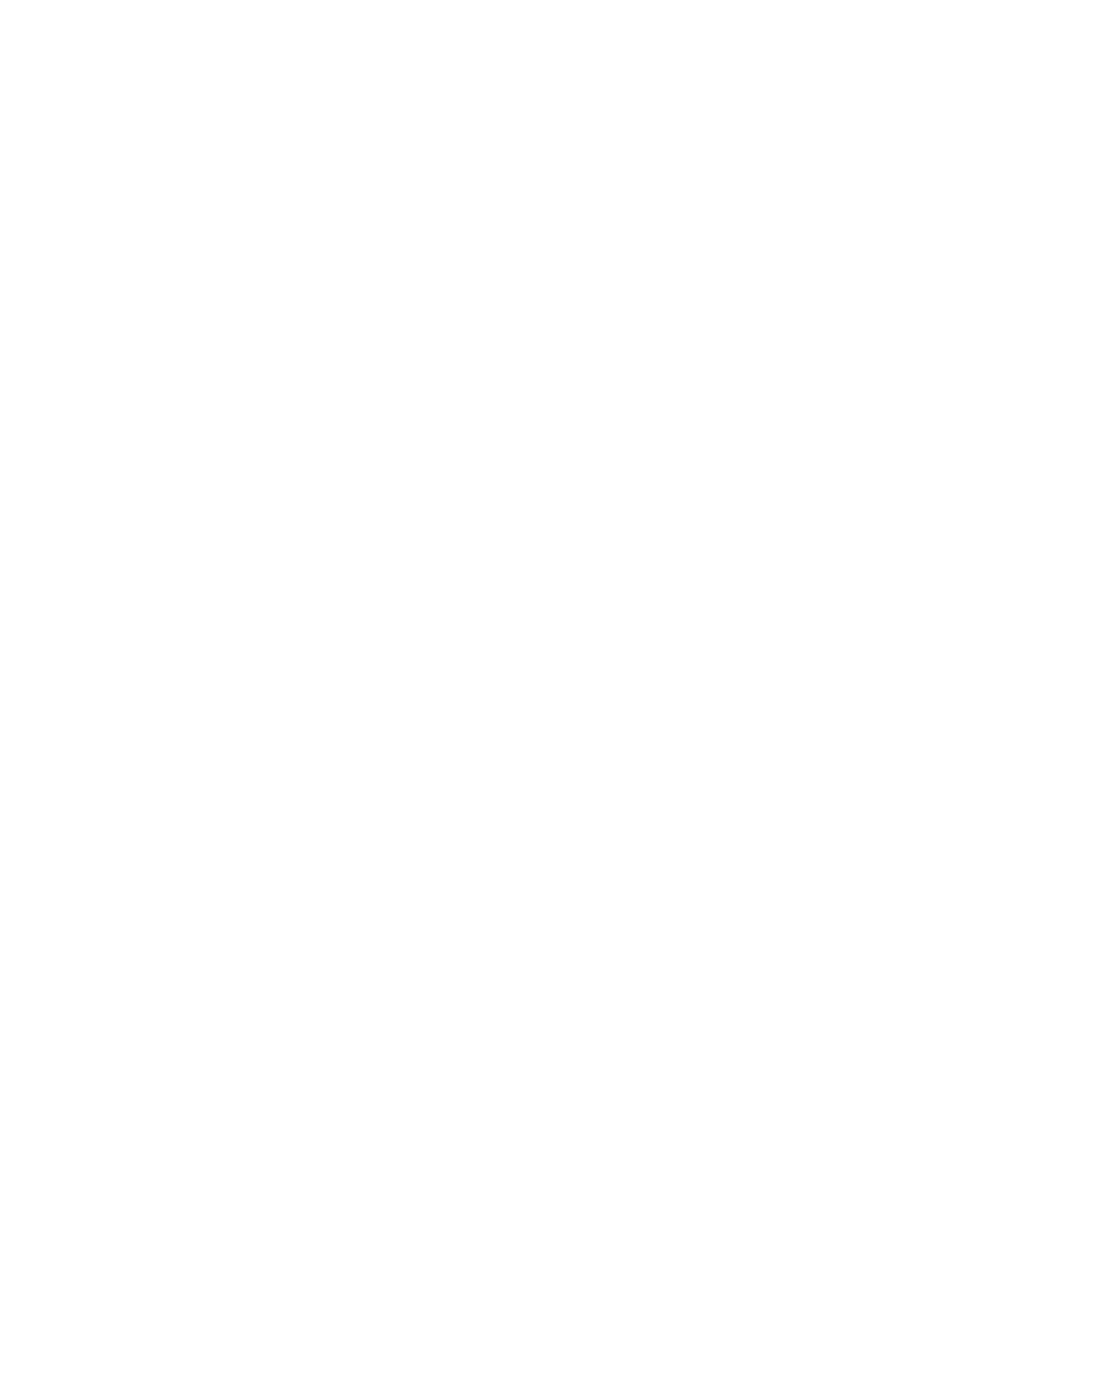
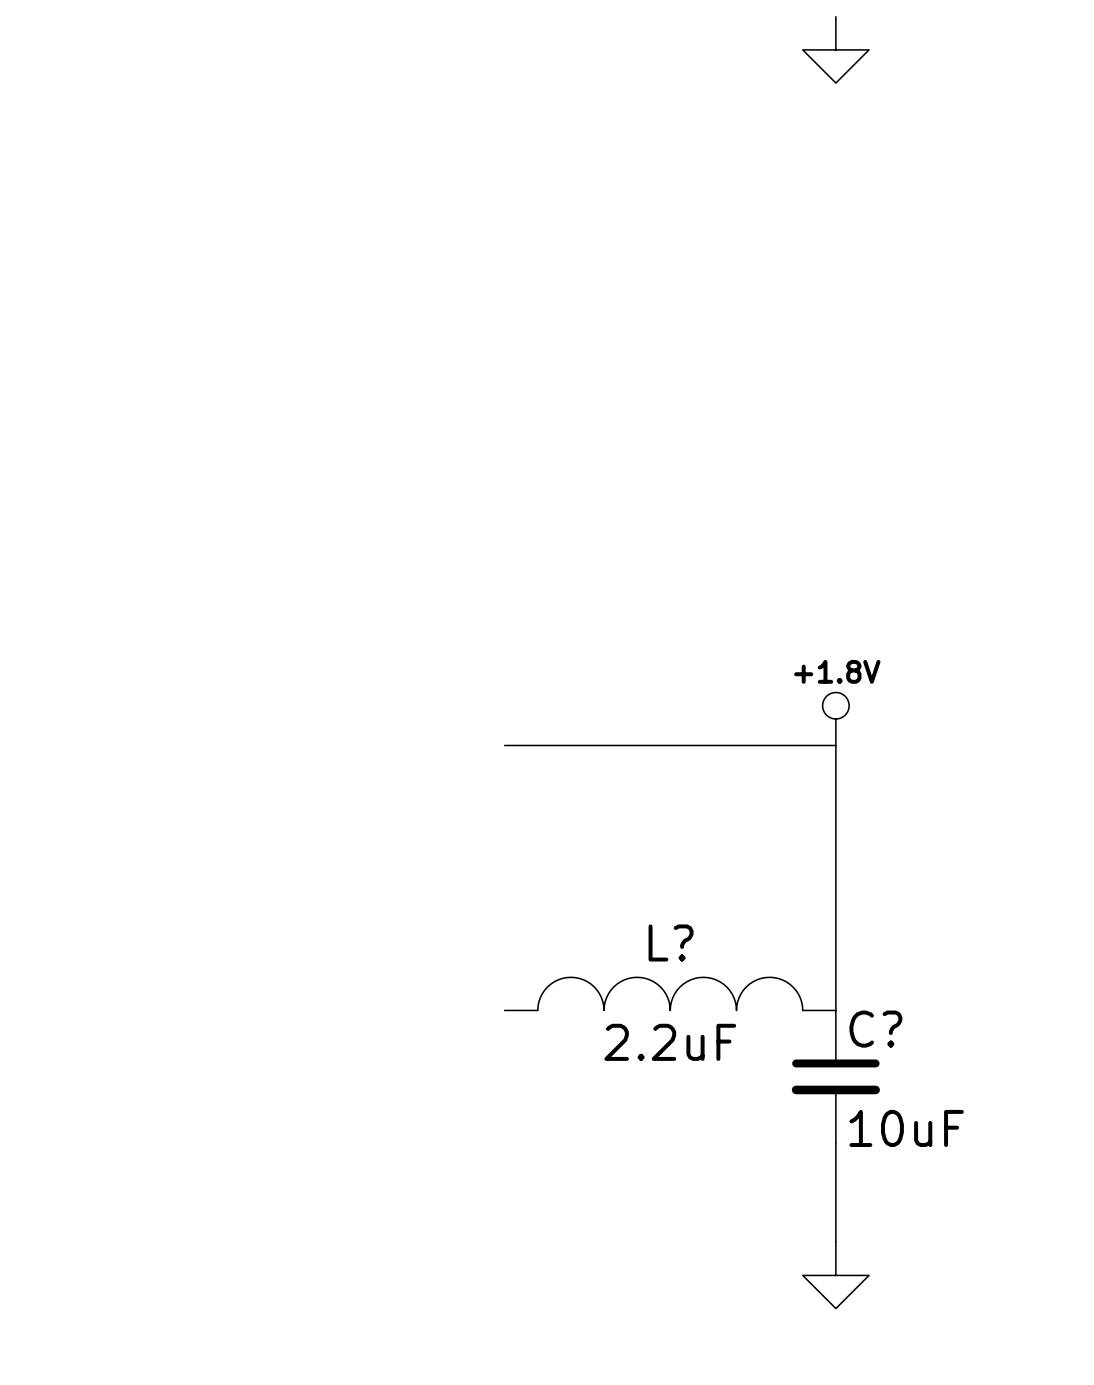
power symbol: none -> (835, 49)
power symbol: none -> +1.8V (835, 718)
wire: none -> (504, 745) (835, 745) (835, 1010)
L?: none -> 2.2uF (670, 993)
C?: none -> 10uF (835, 1076)
wire: none -> (835, 1142) (835, 1242)
power symbol: none -> (835, 1275)

